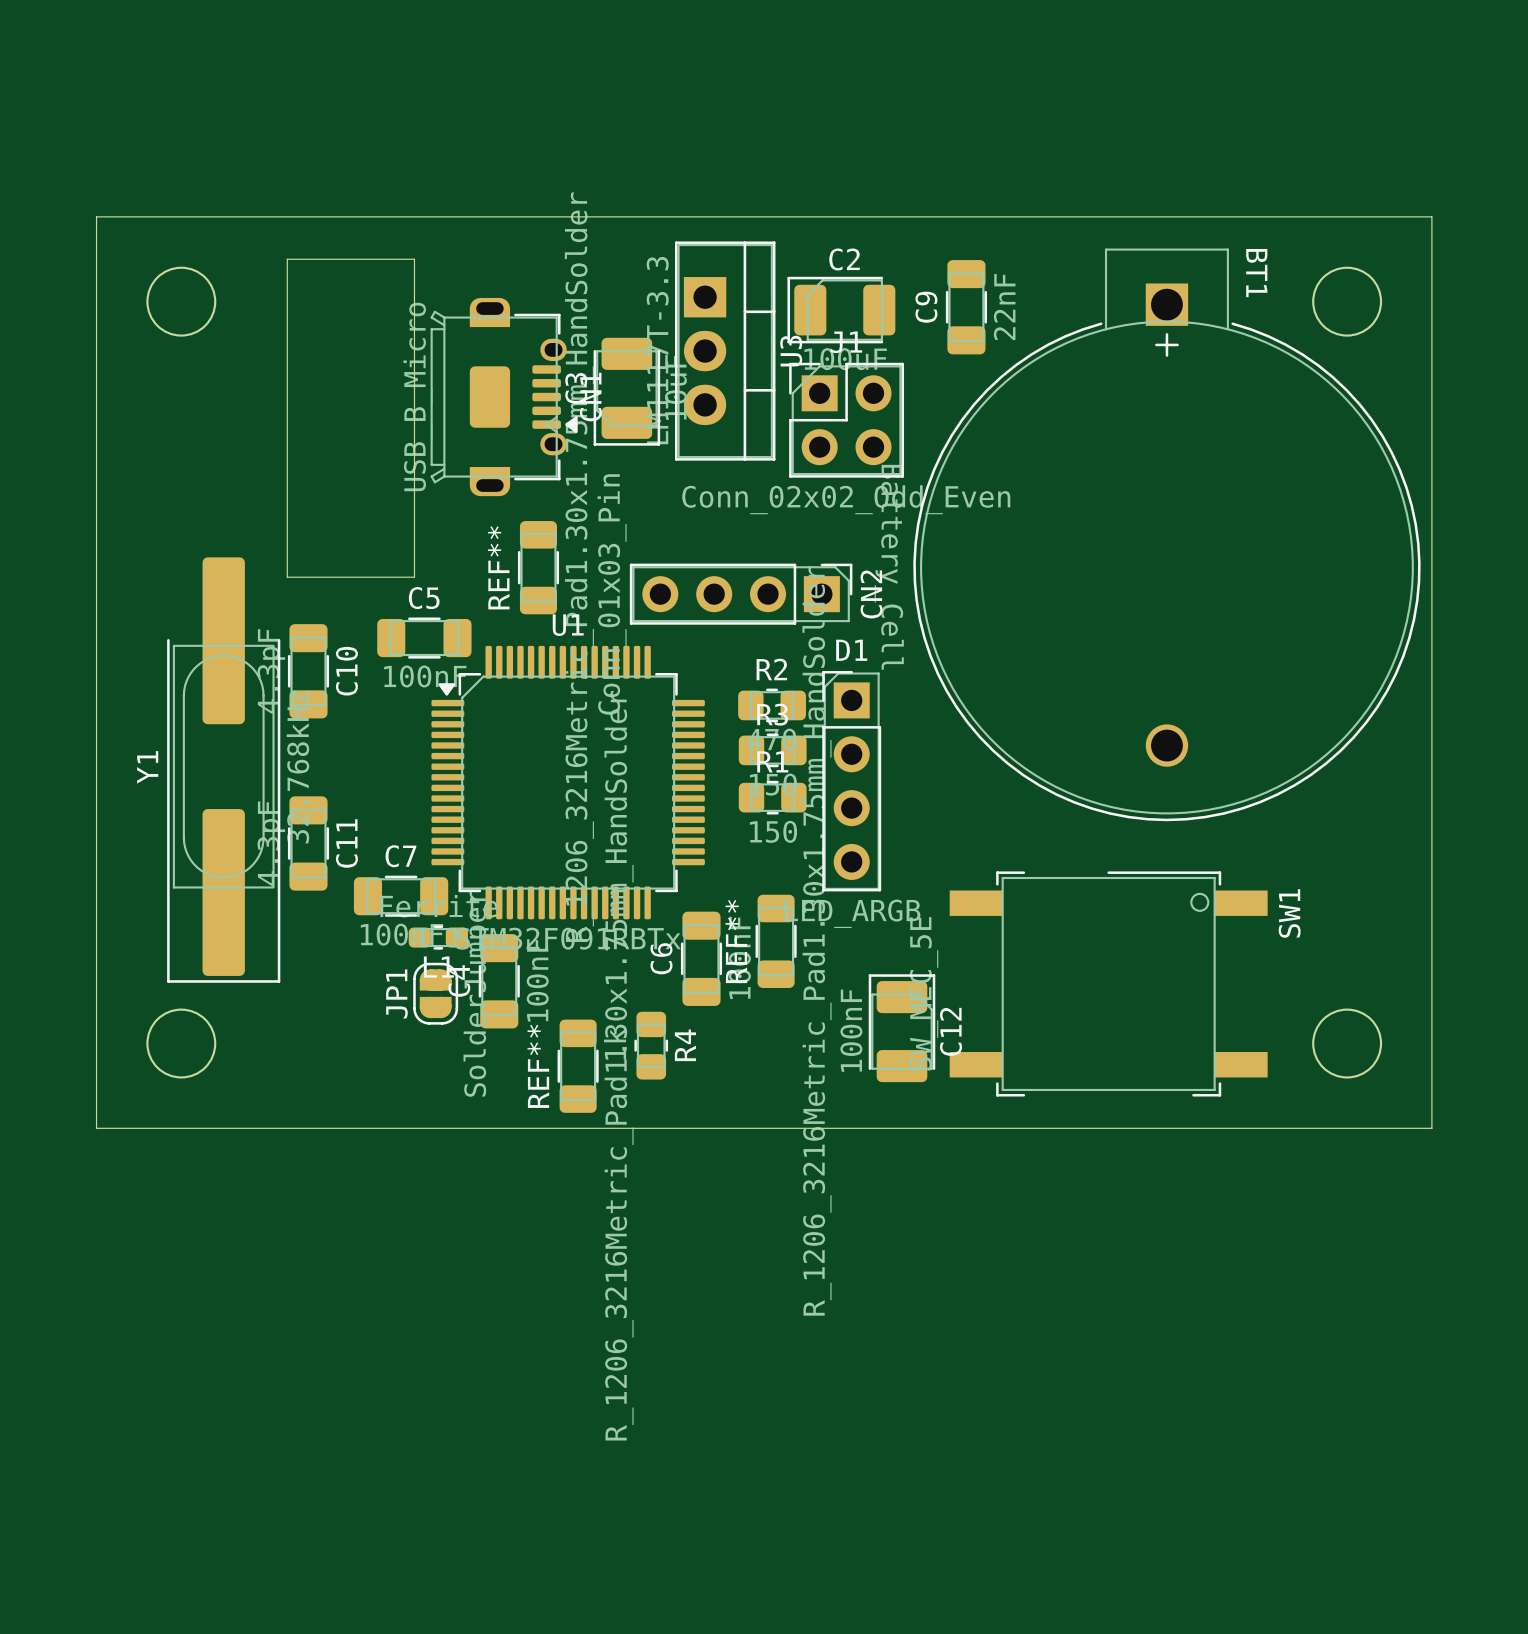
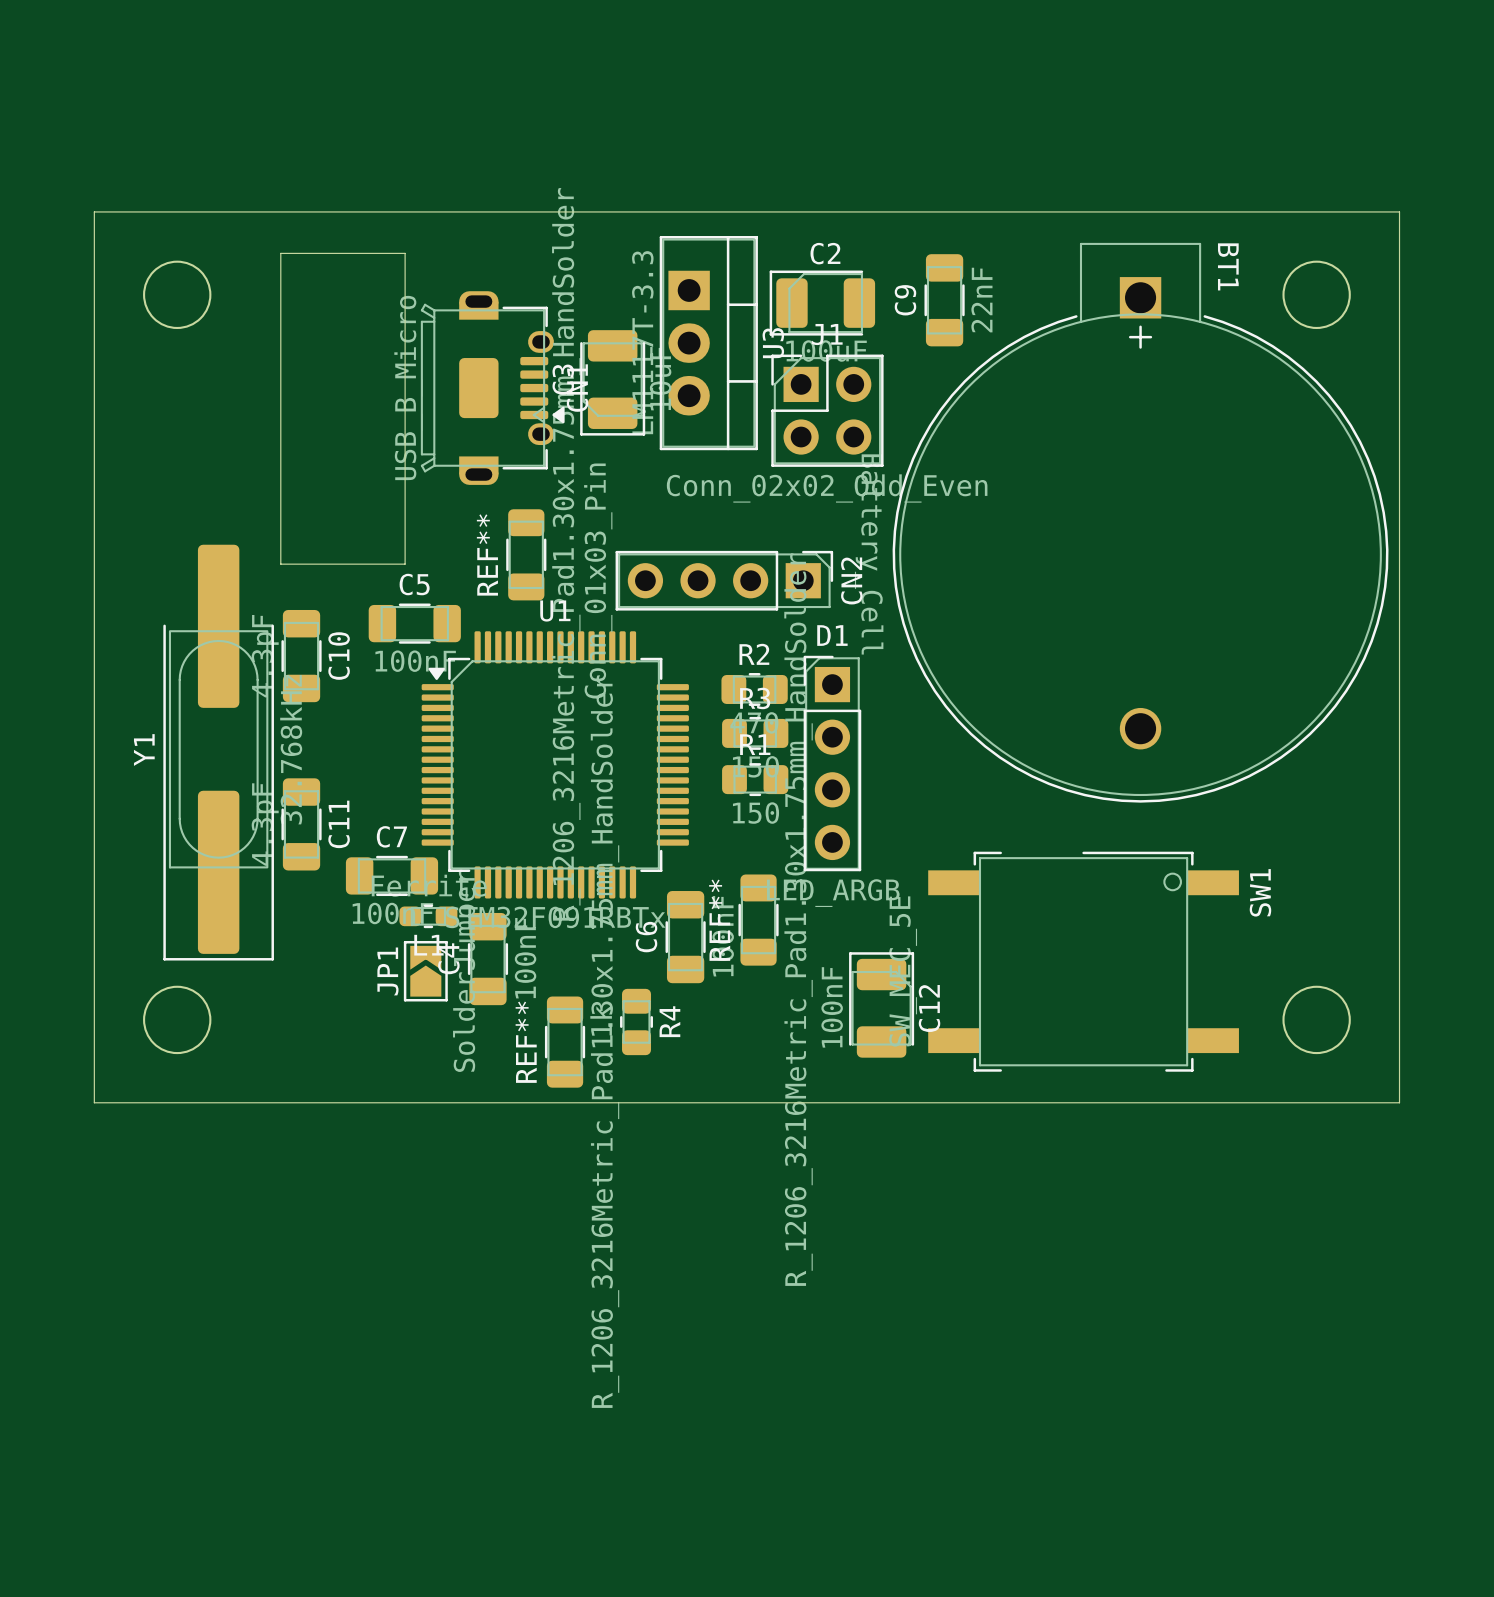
JP1 footprint: [413, 962, 459, 1025] -> [403, 940, 448, 1002]

